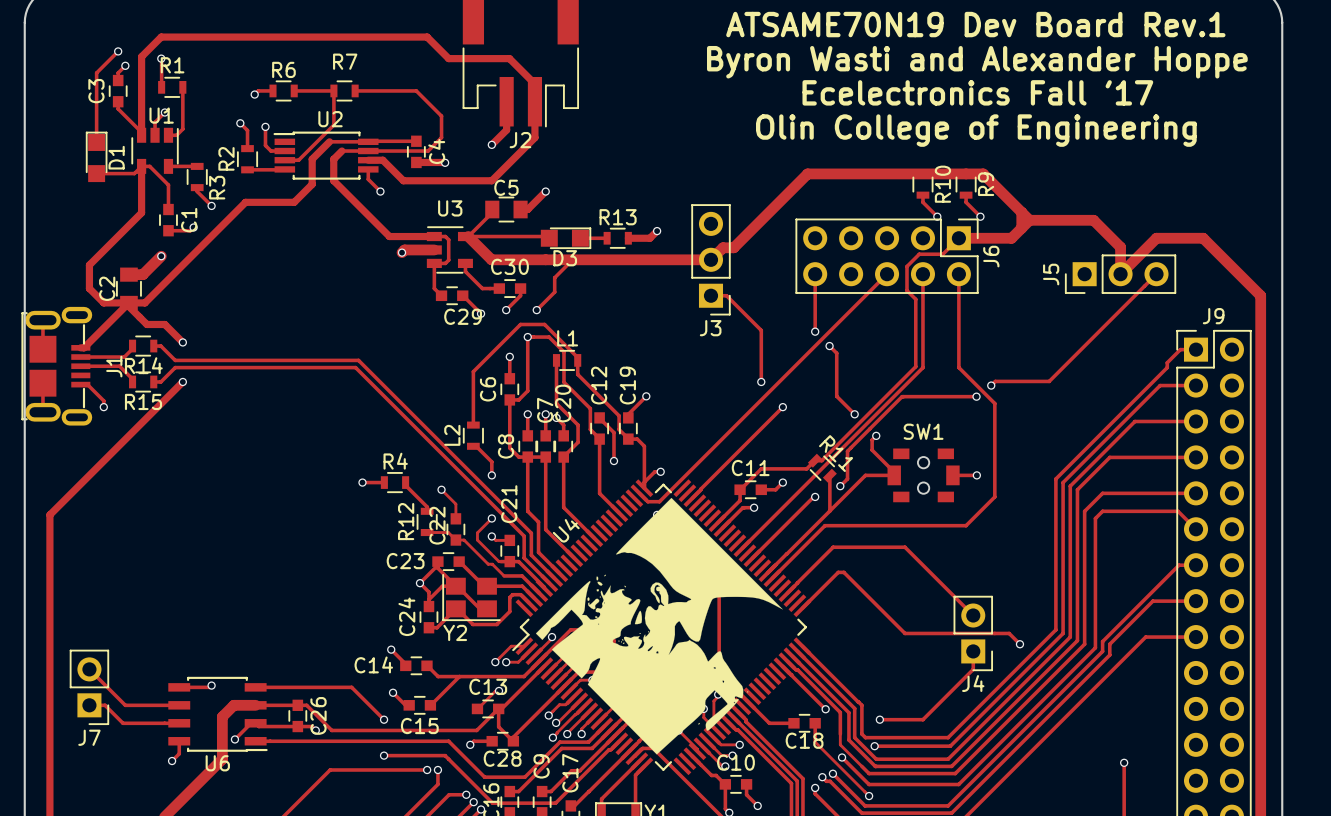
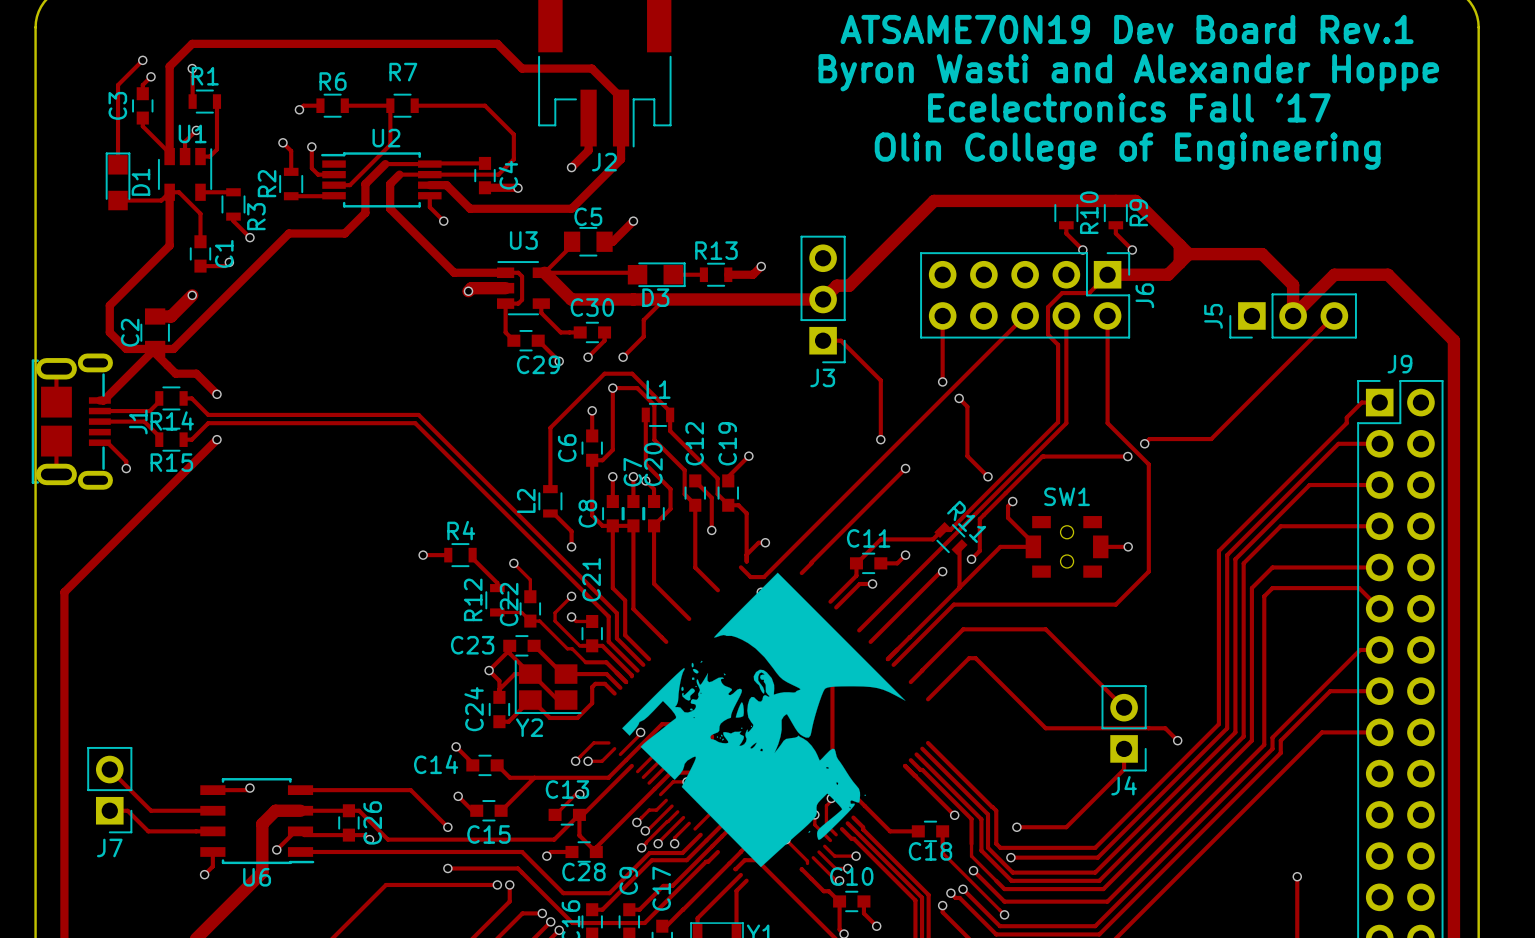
U4: (661, 627) -> none

